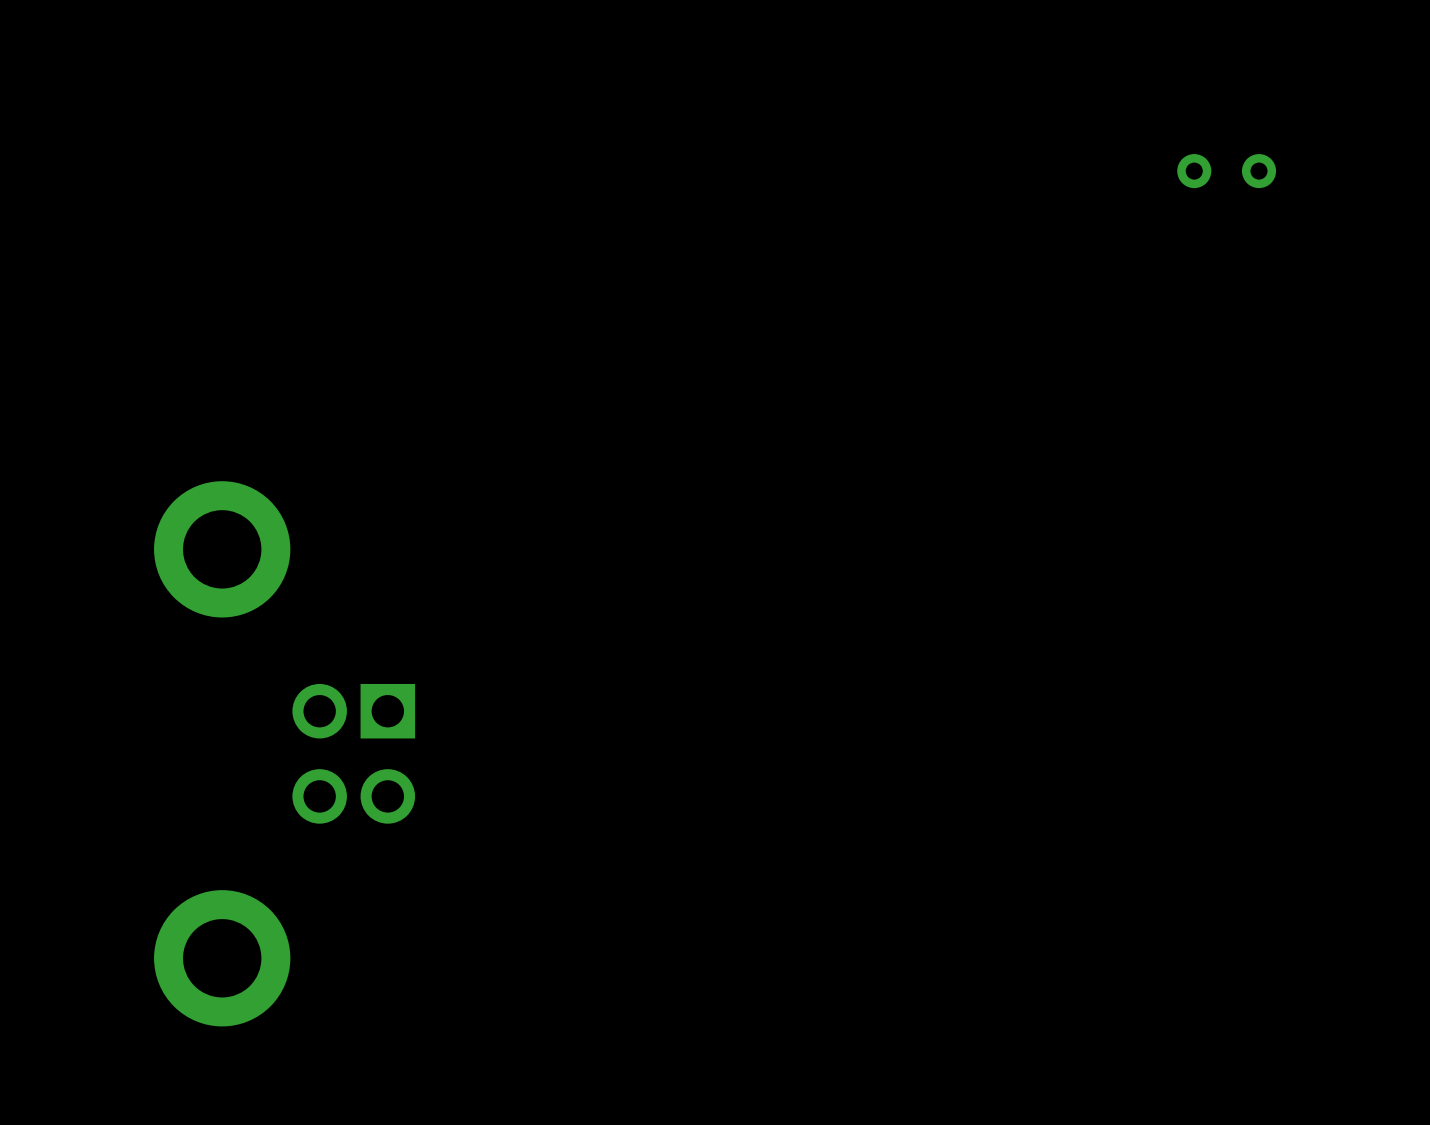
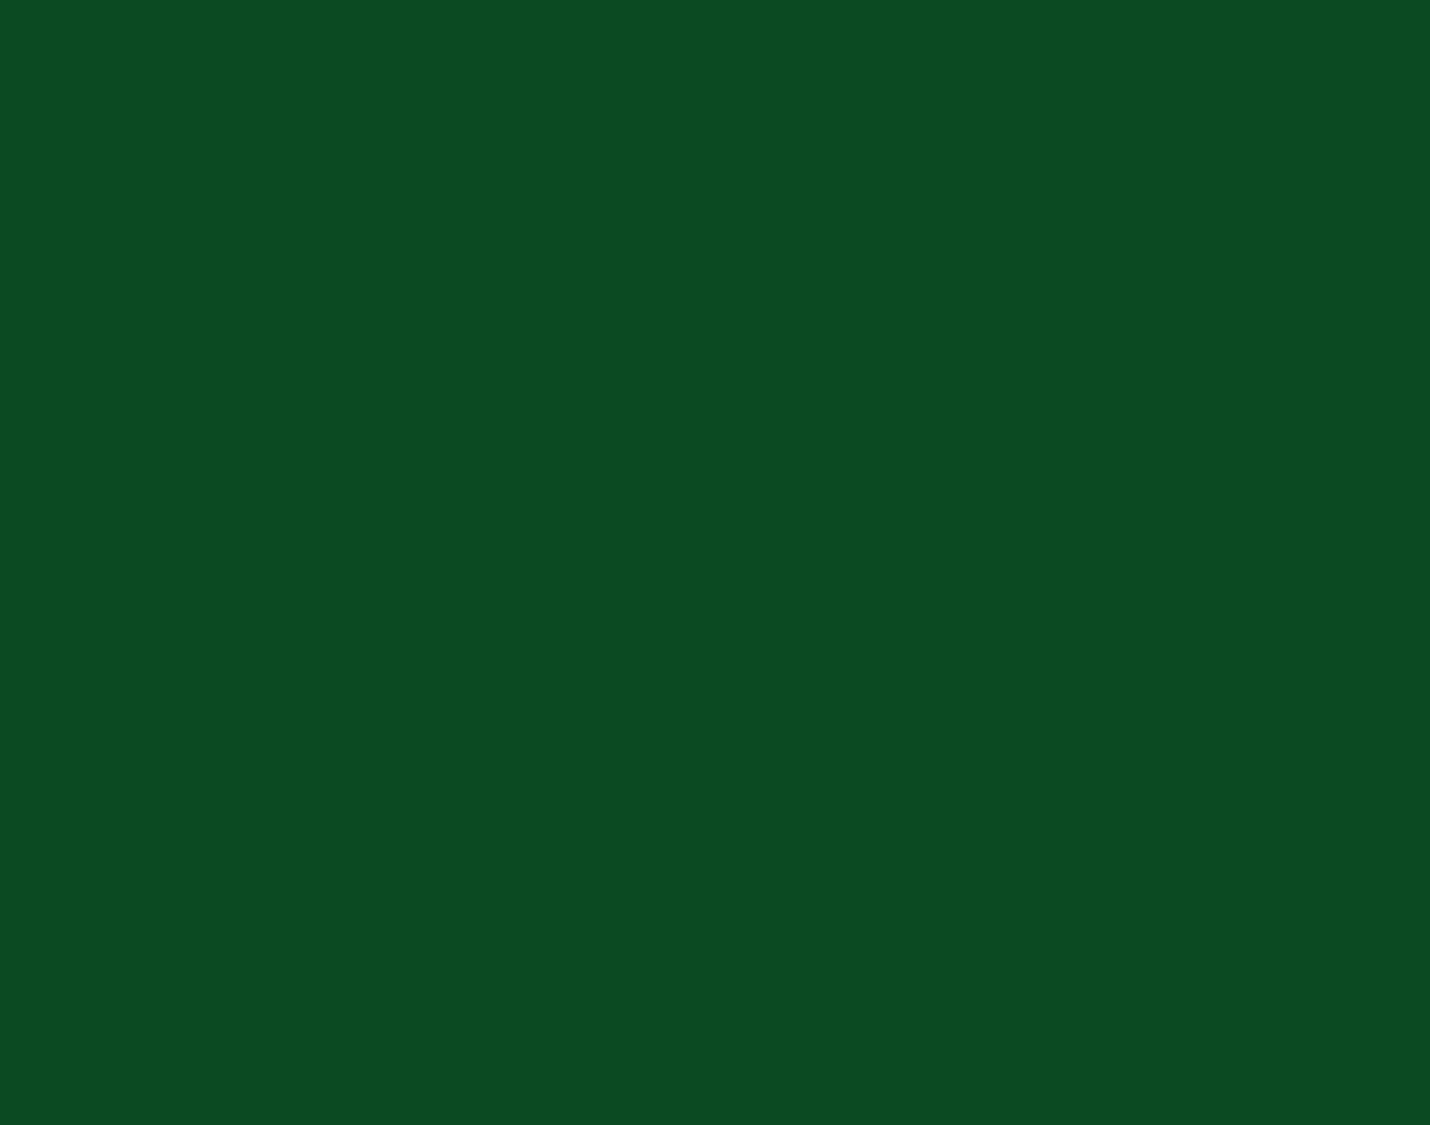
part: (1226, 171) -> none
part: (284, 753) -> none

